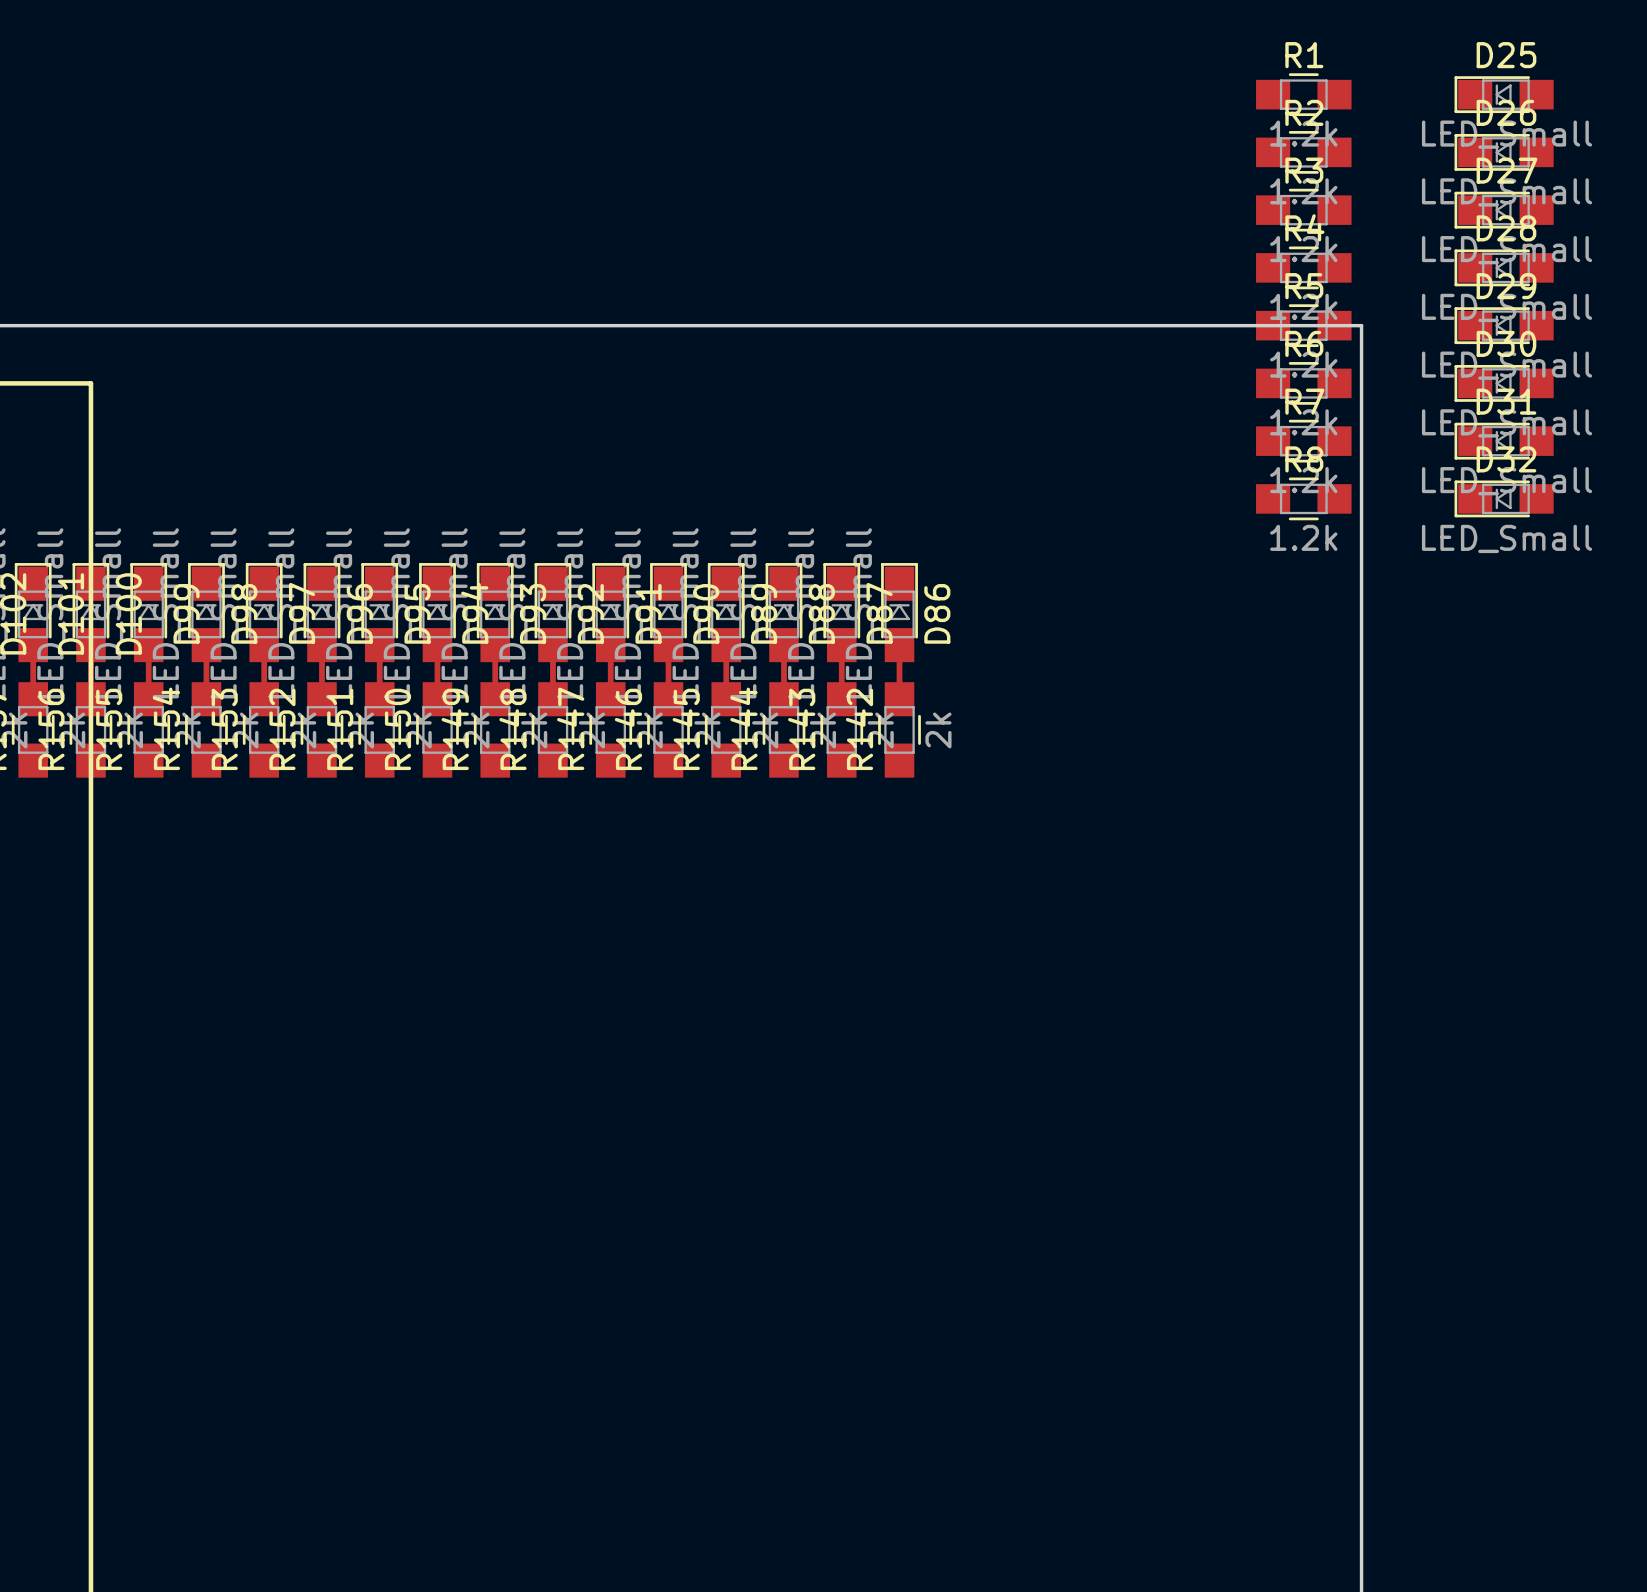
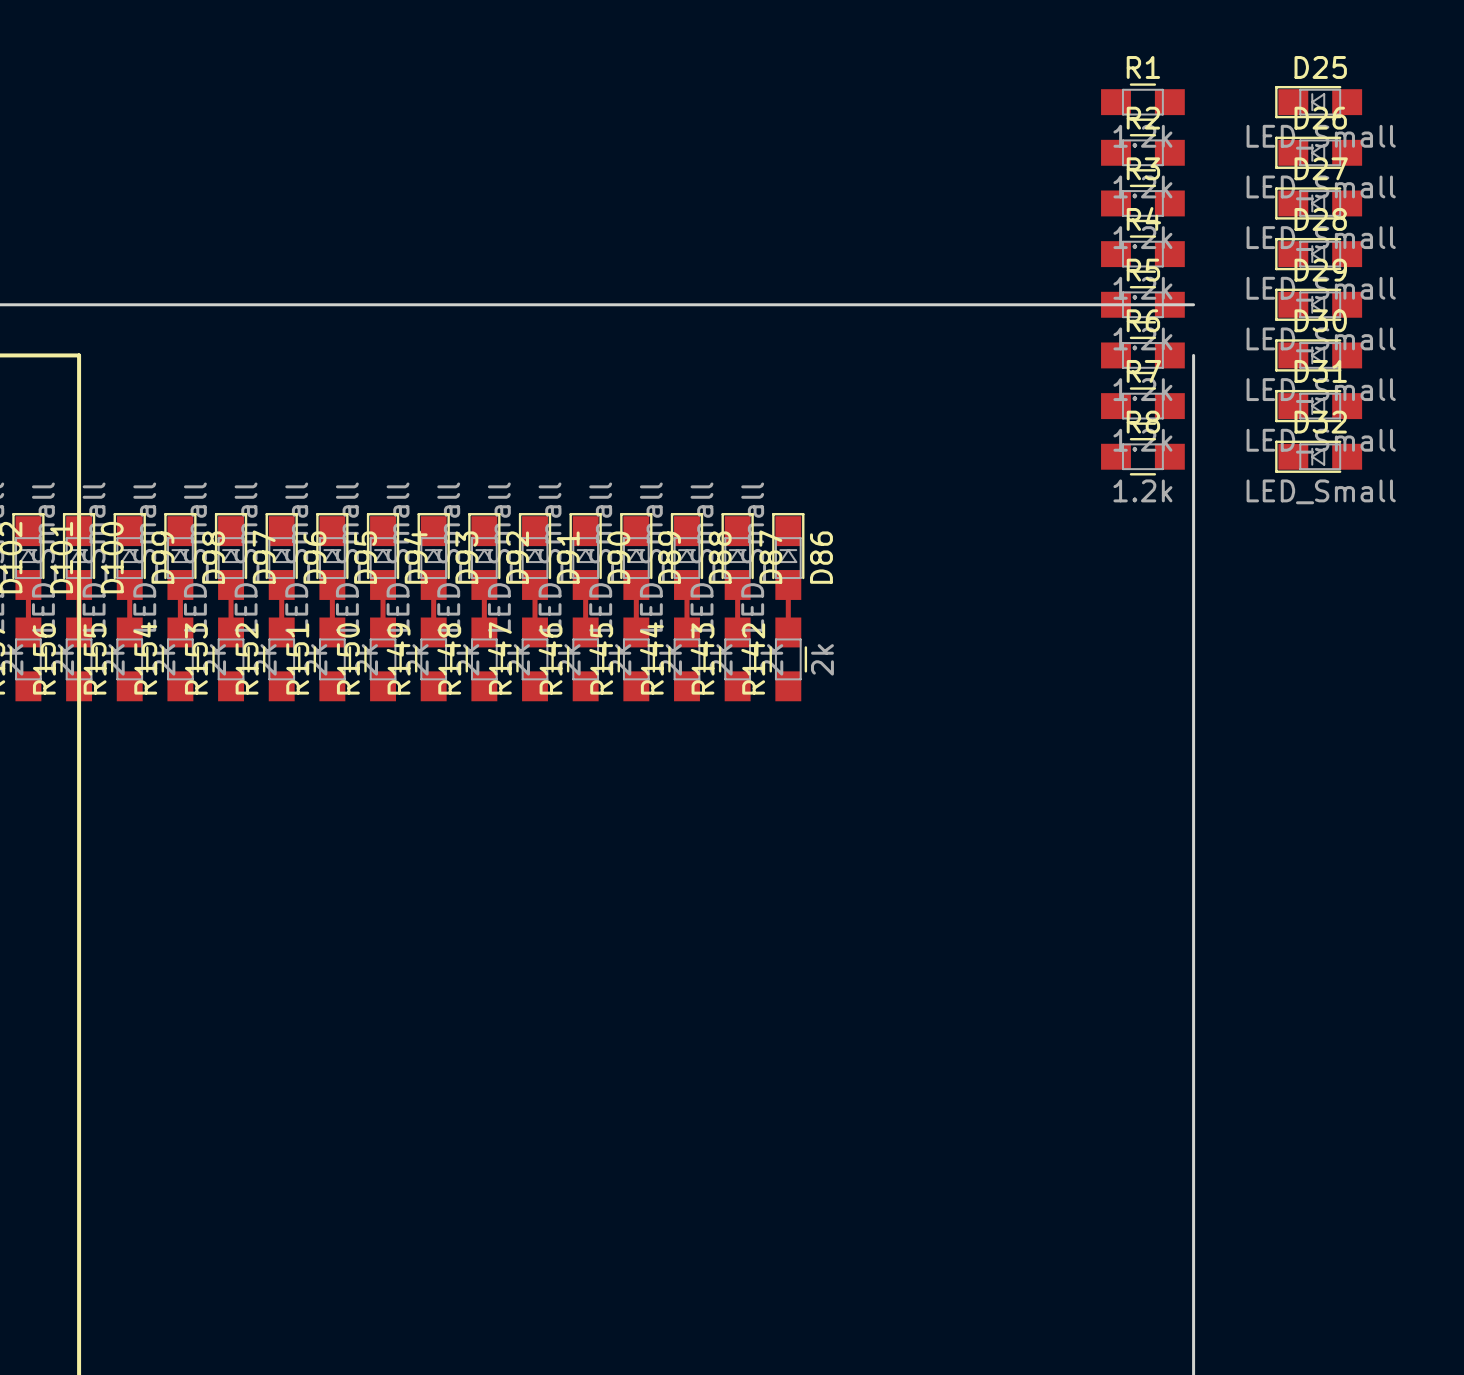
board edge: (1361, 325) (1361, 383) -> none

